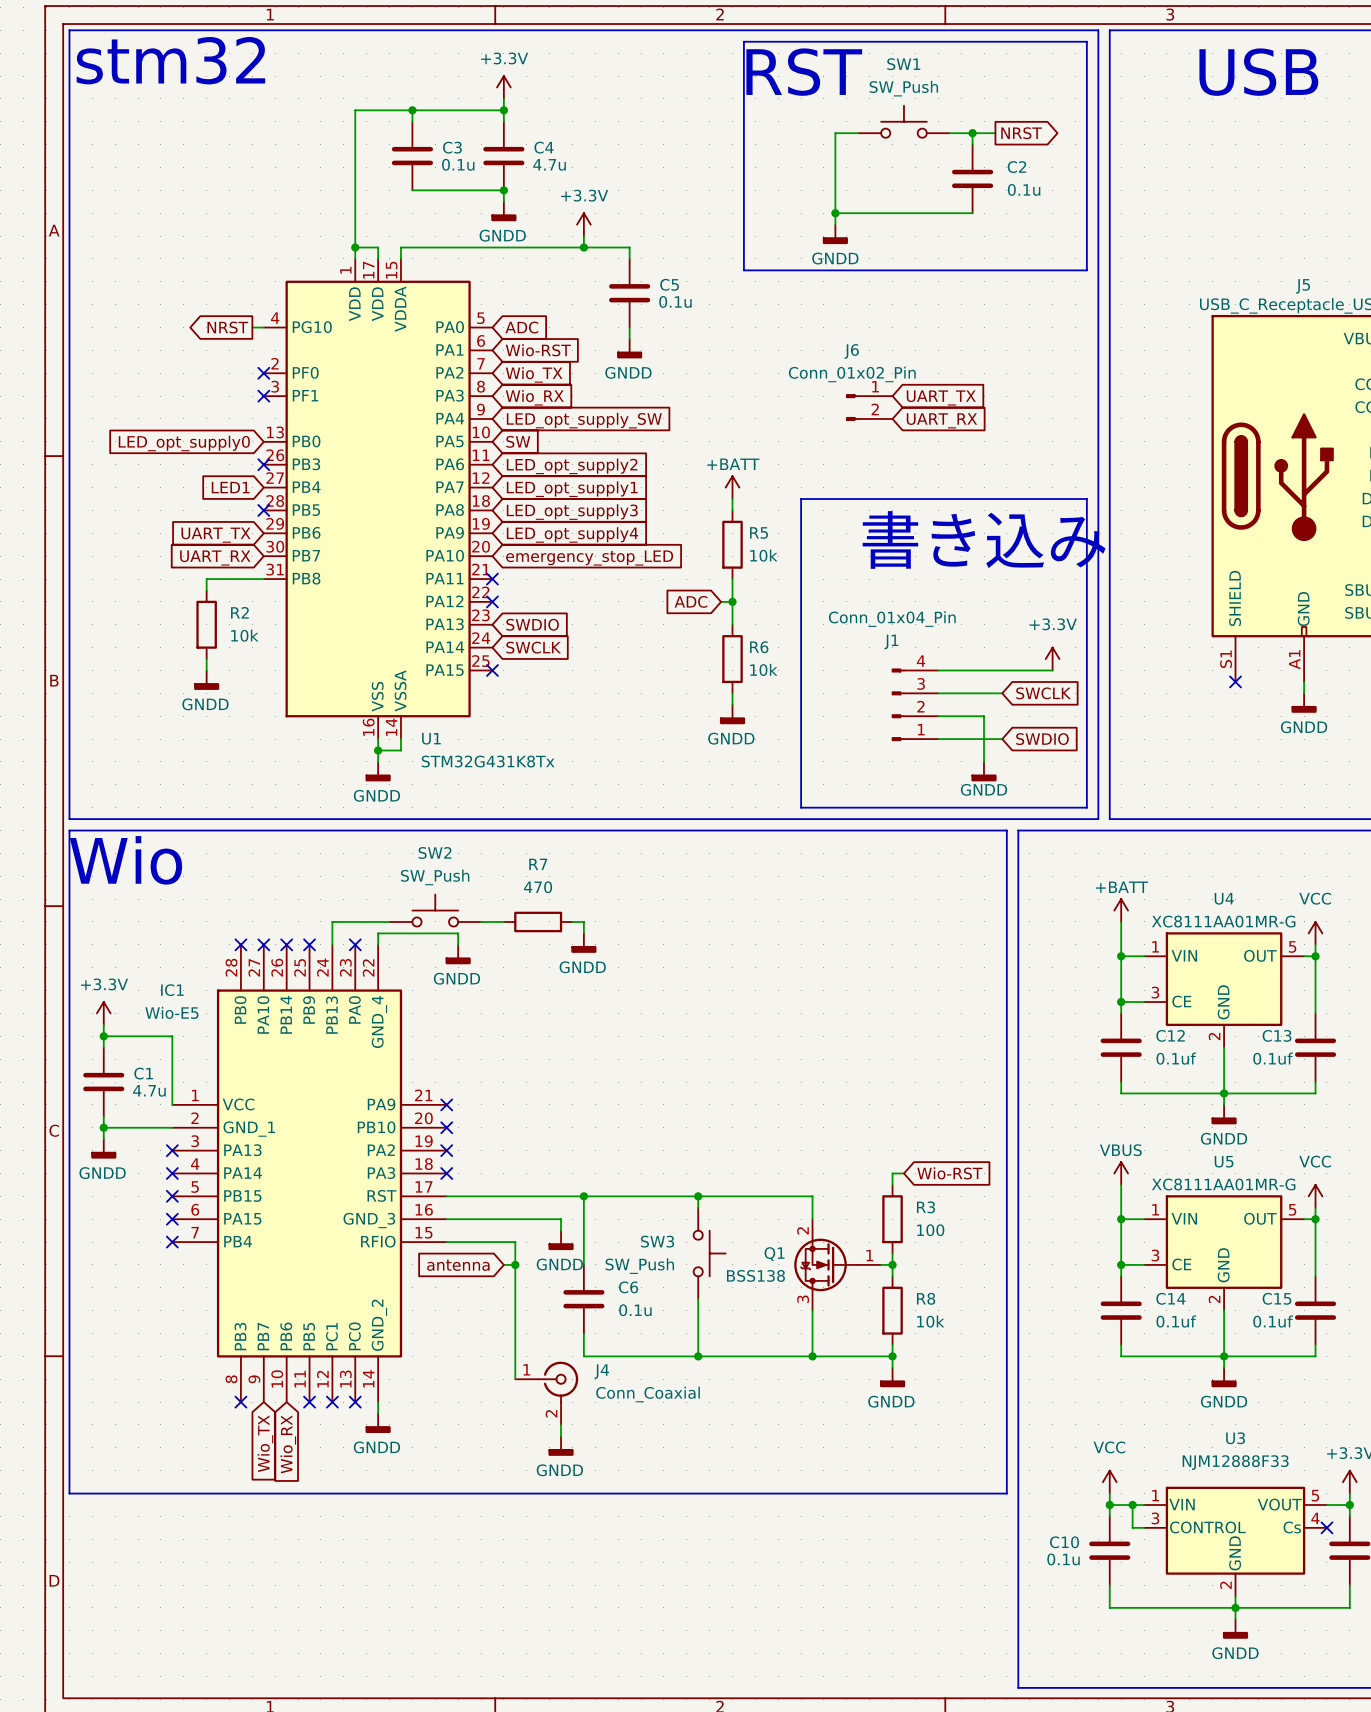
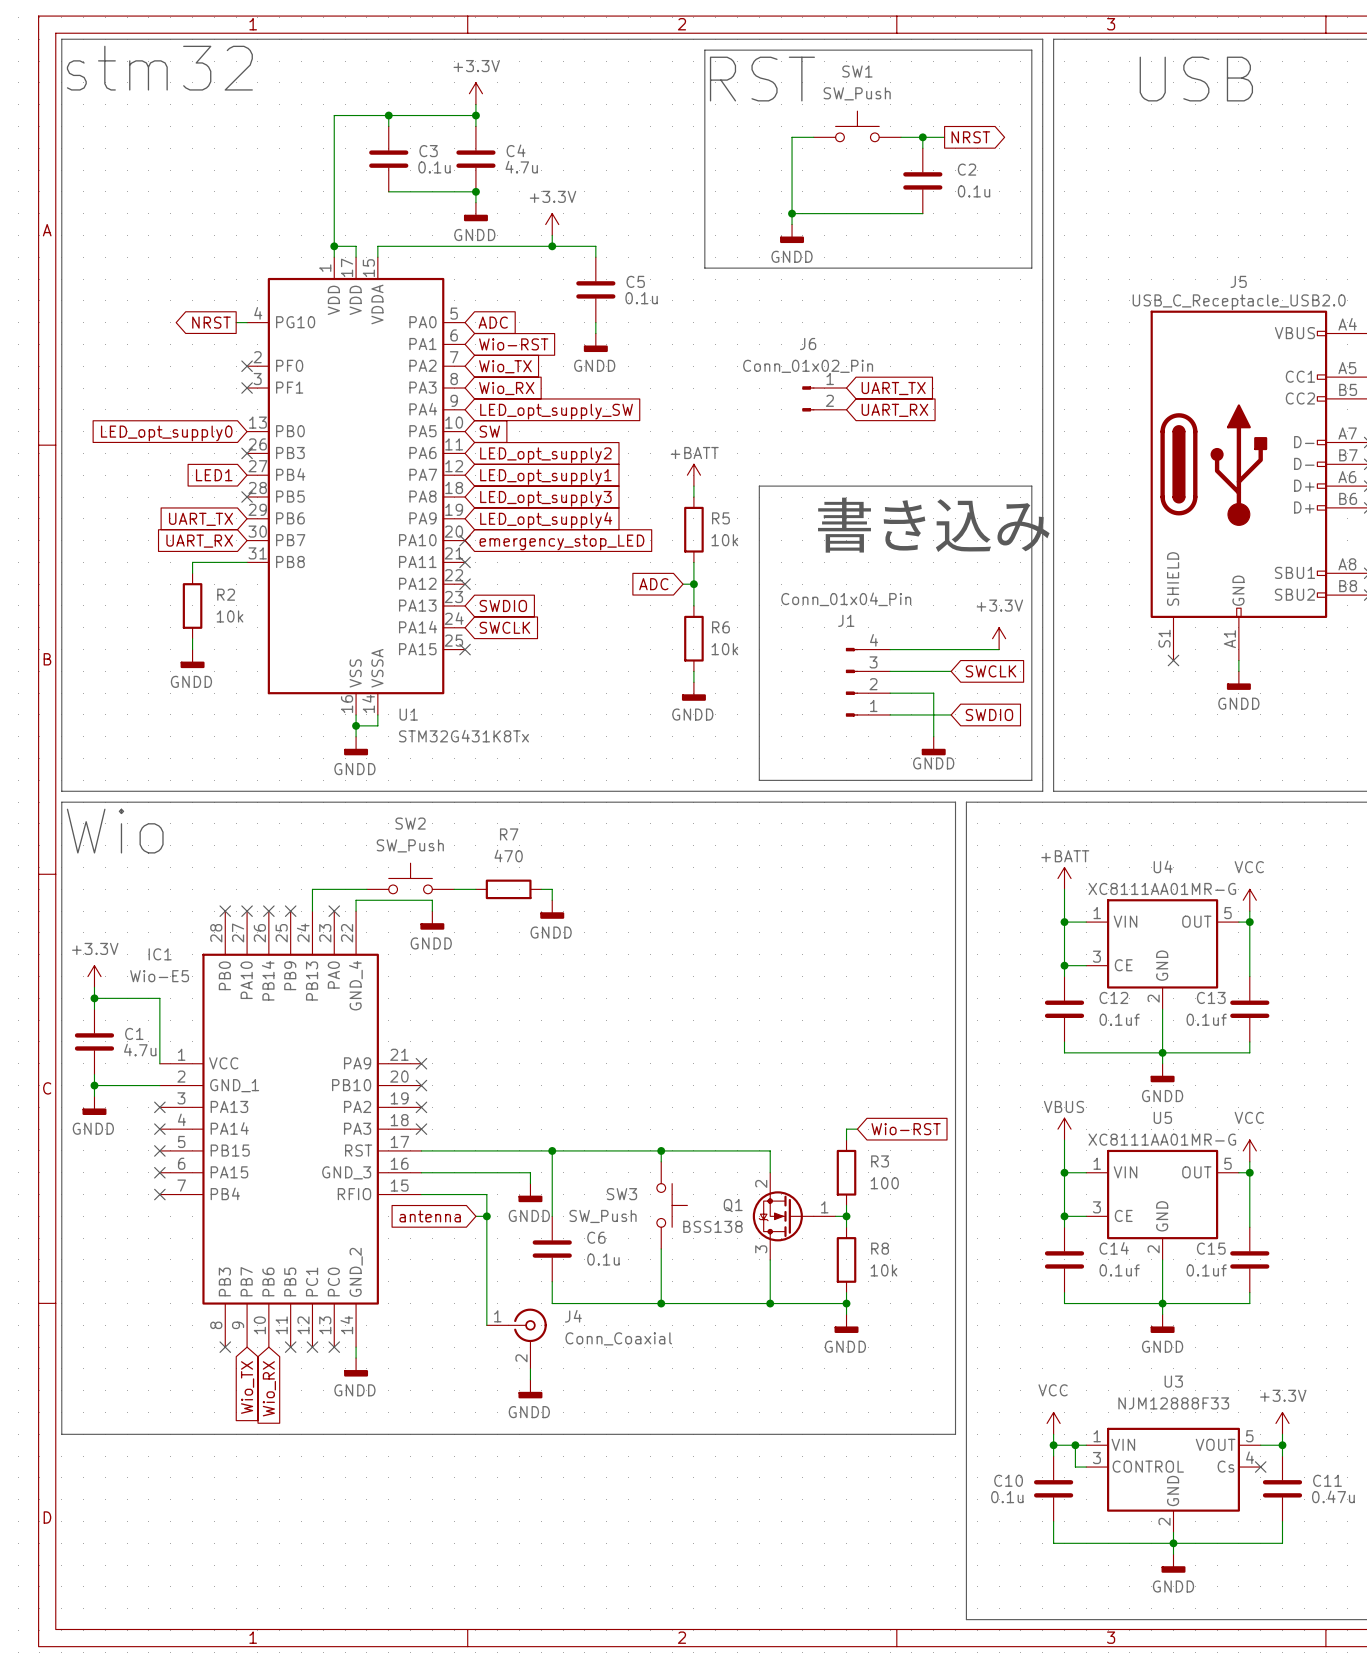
no-connect mark: none -> (465, 540)

